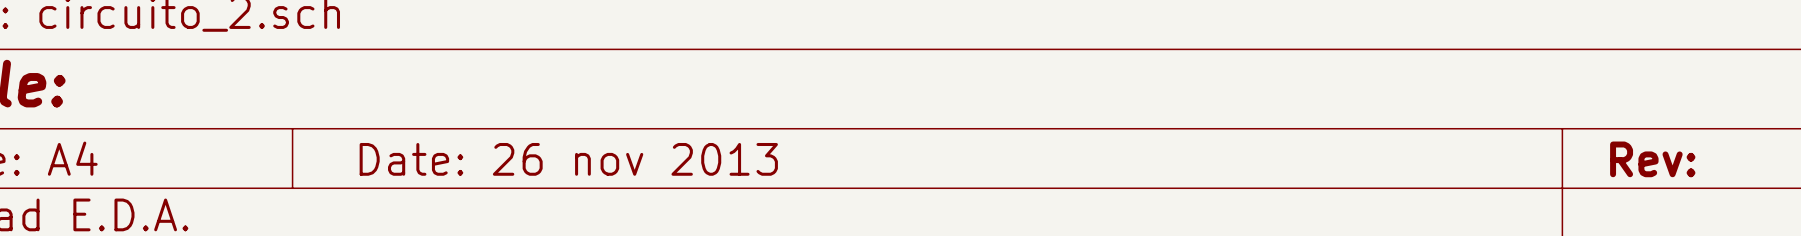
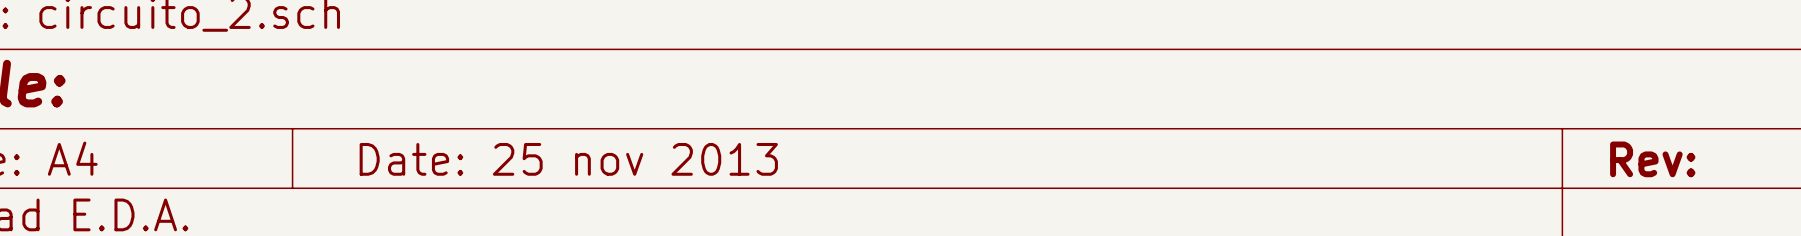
title block: Date: 26 nov 2013 (568, 159) -> Date: 25 nov 2013 (568, 159)

